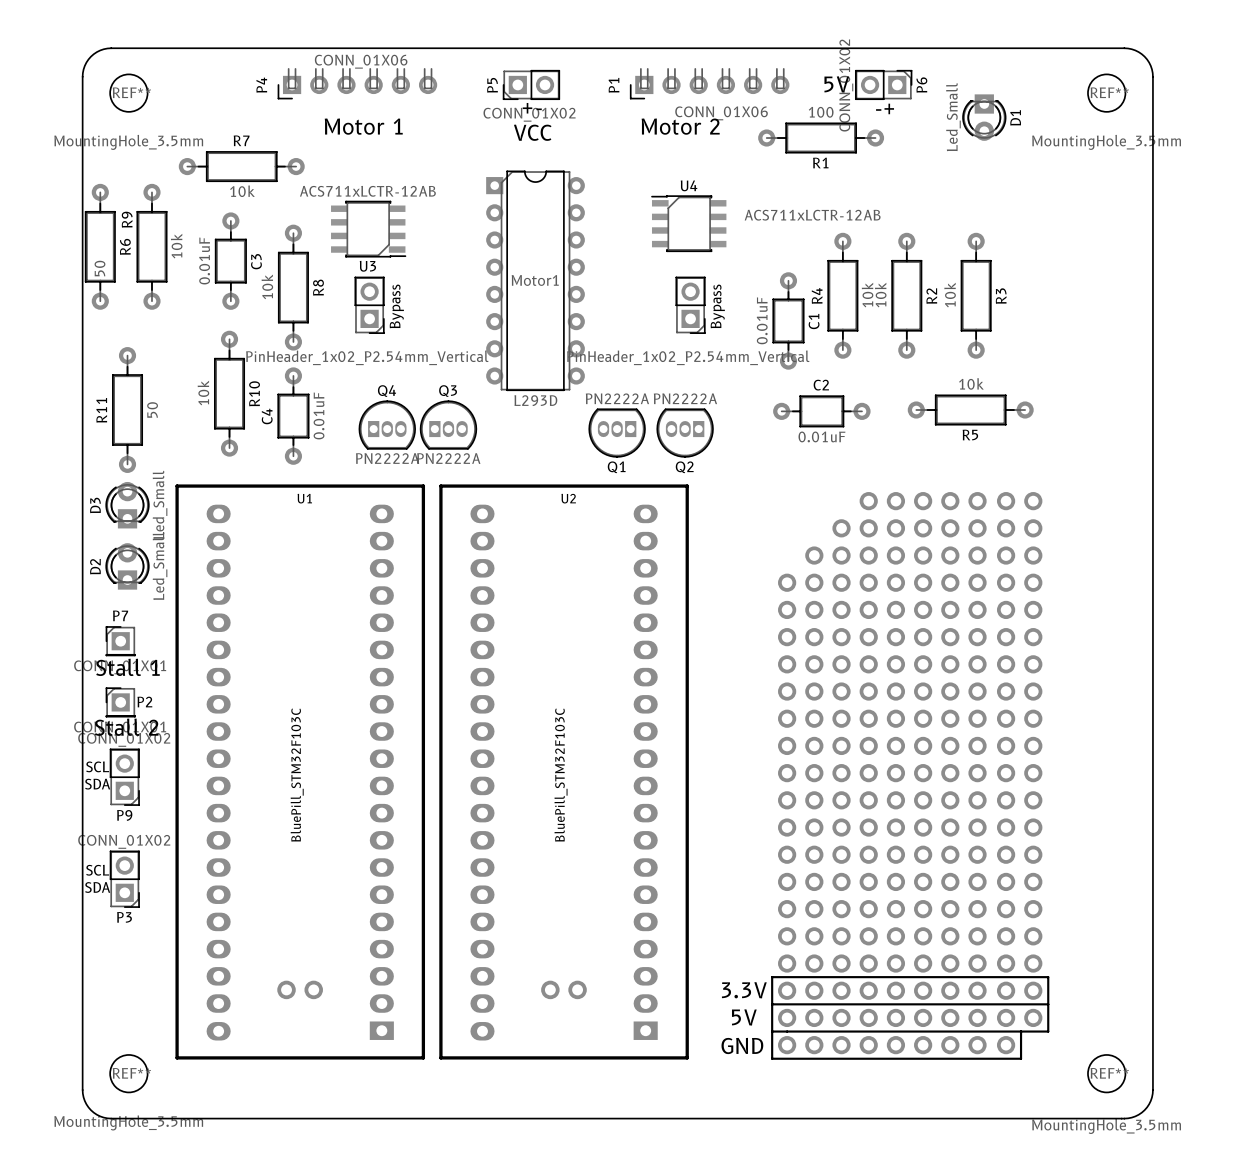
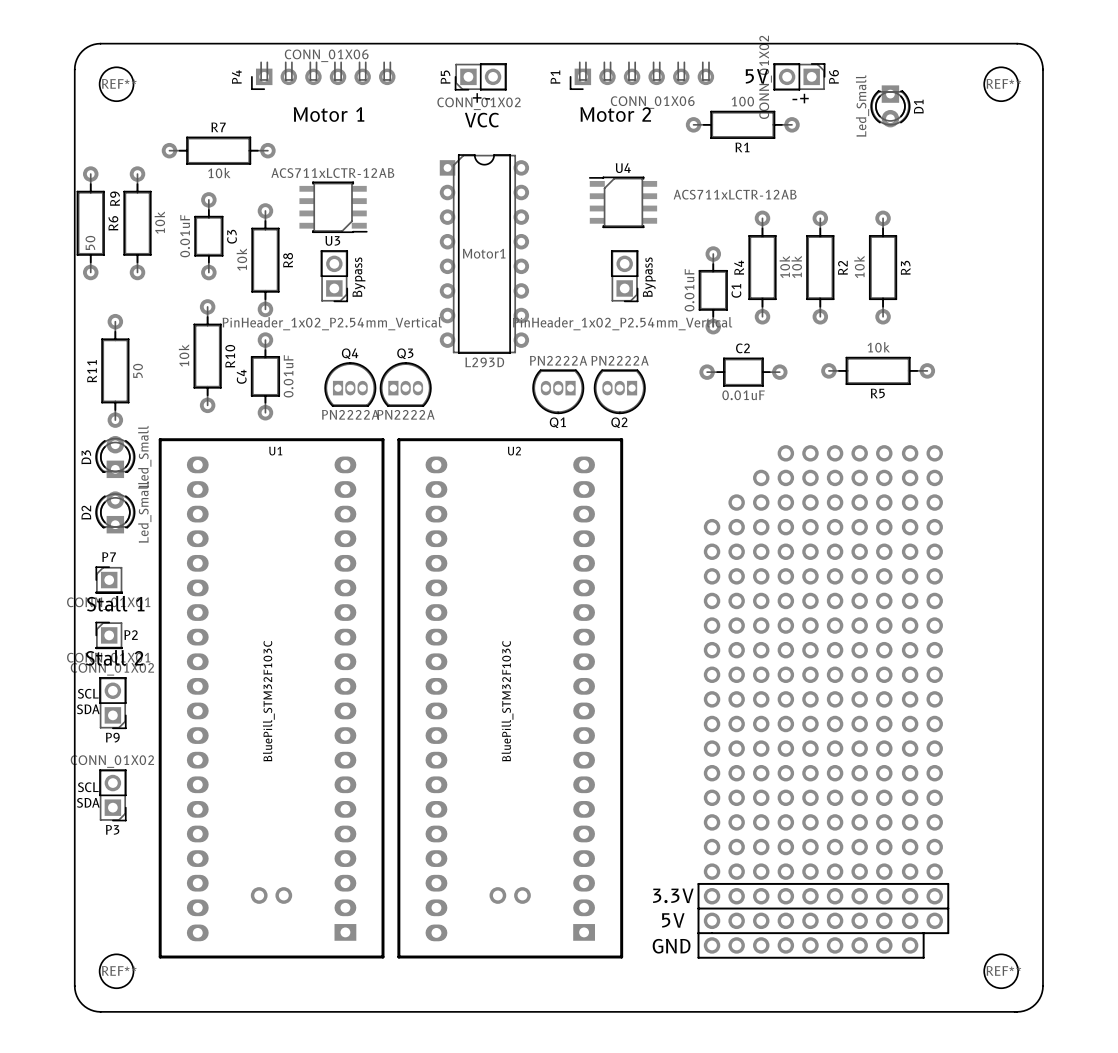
REF** value: MountingHole_3.5mm (128, 142) -> none
REF** value: MountingHole_3.5mm (1106, 142) -> none
REF** value: MountingHole_3.5mm (128, 1122) -> none
REF** value: MountingHole_3.5mm (1106, 1126) -> none

